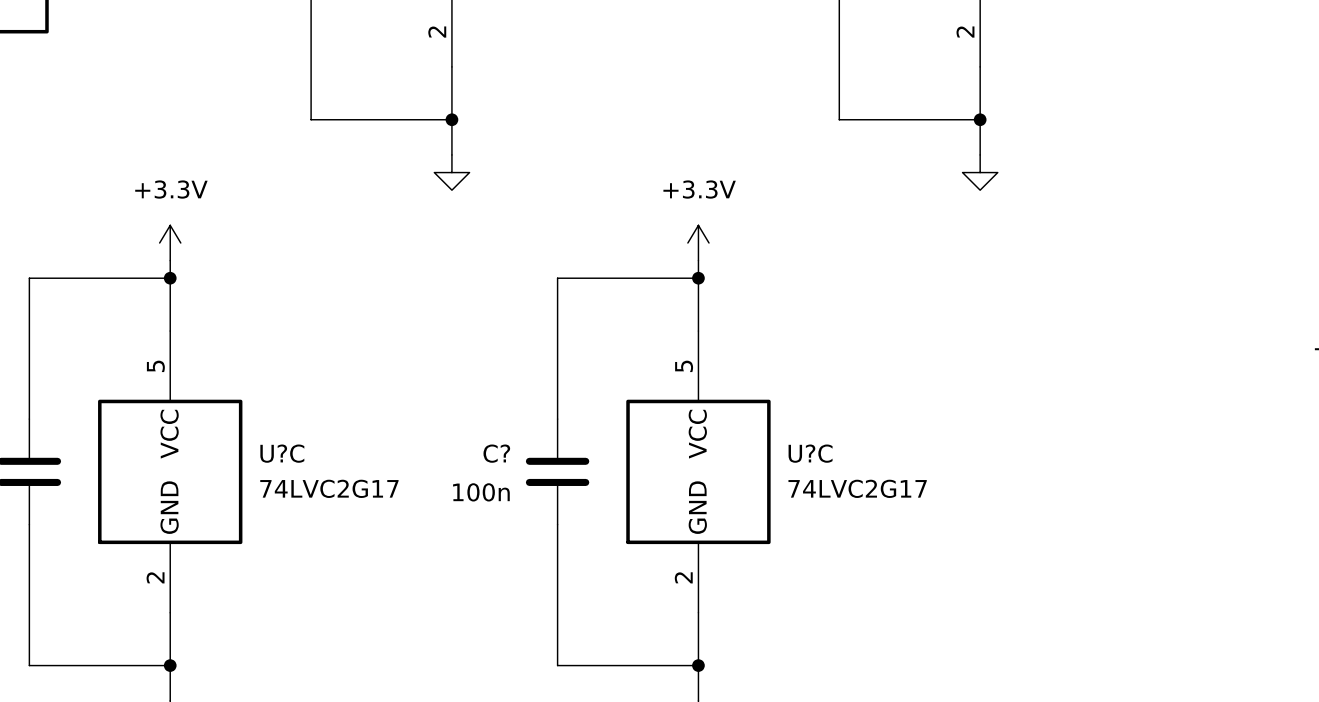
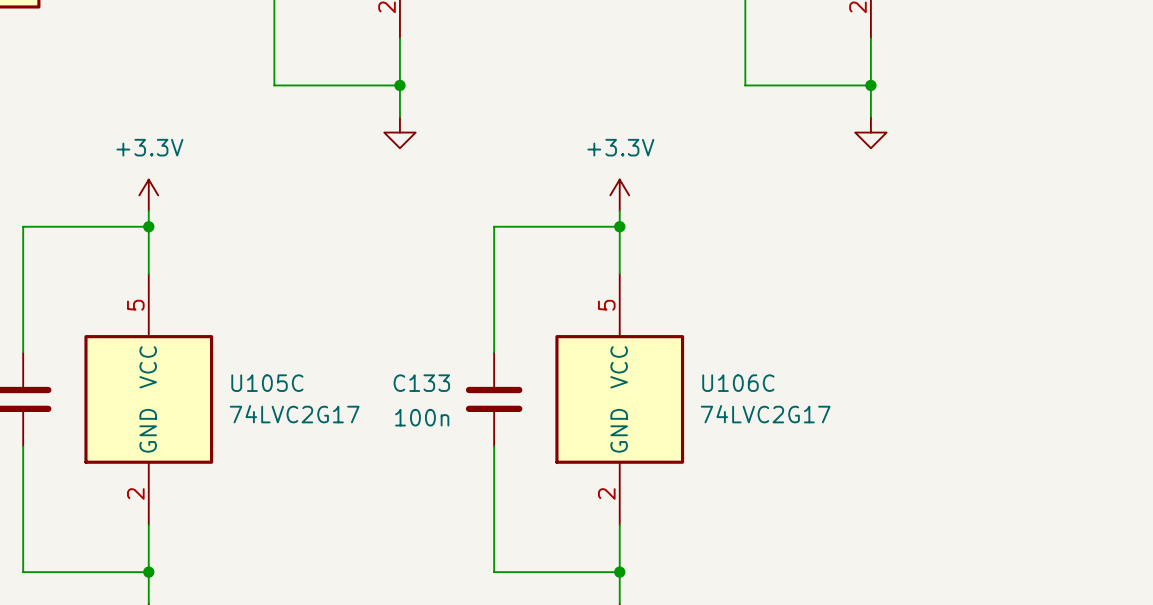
U?C name: U?C (282, 453) -> U105C (267, 383)
C? name: C? (496, 453) -> C133 (421, 383)
U?C name: U?C (810, 453) -> U106C (738, 383)

